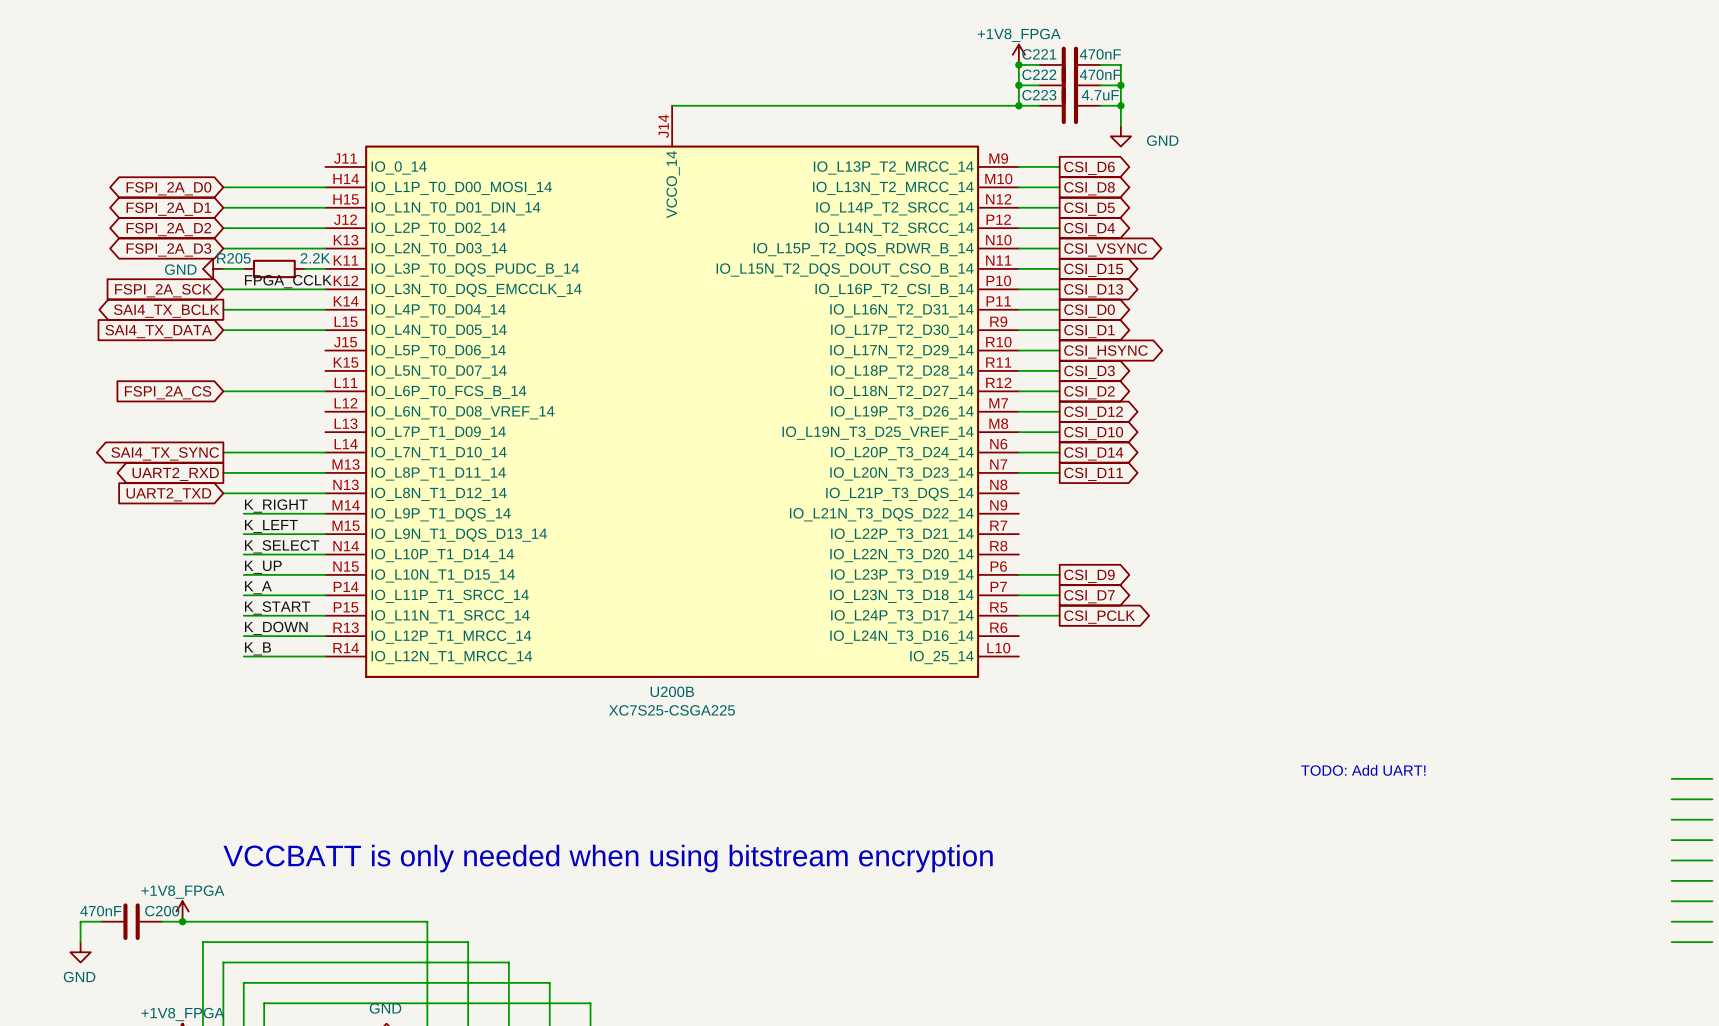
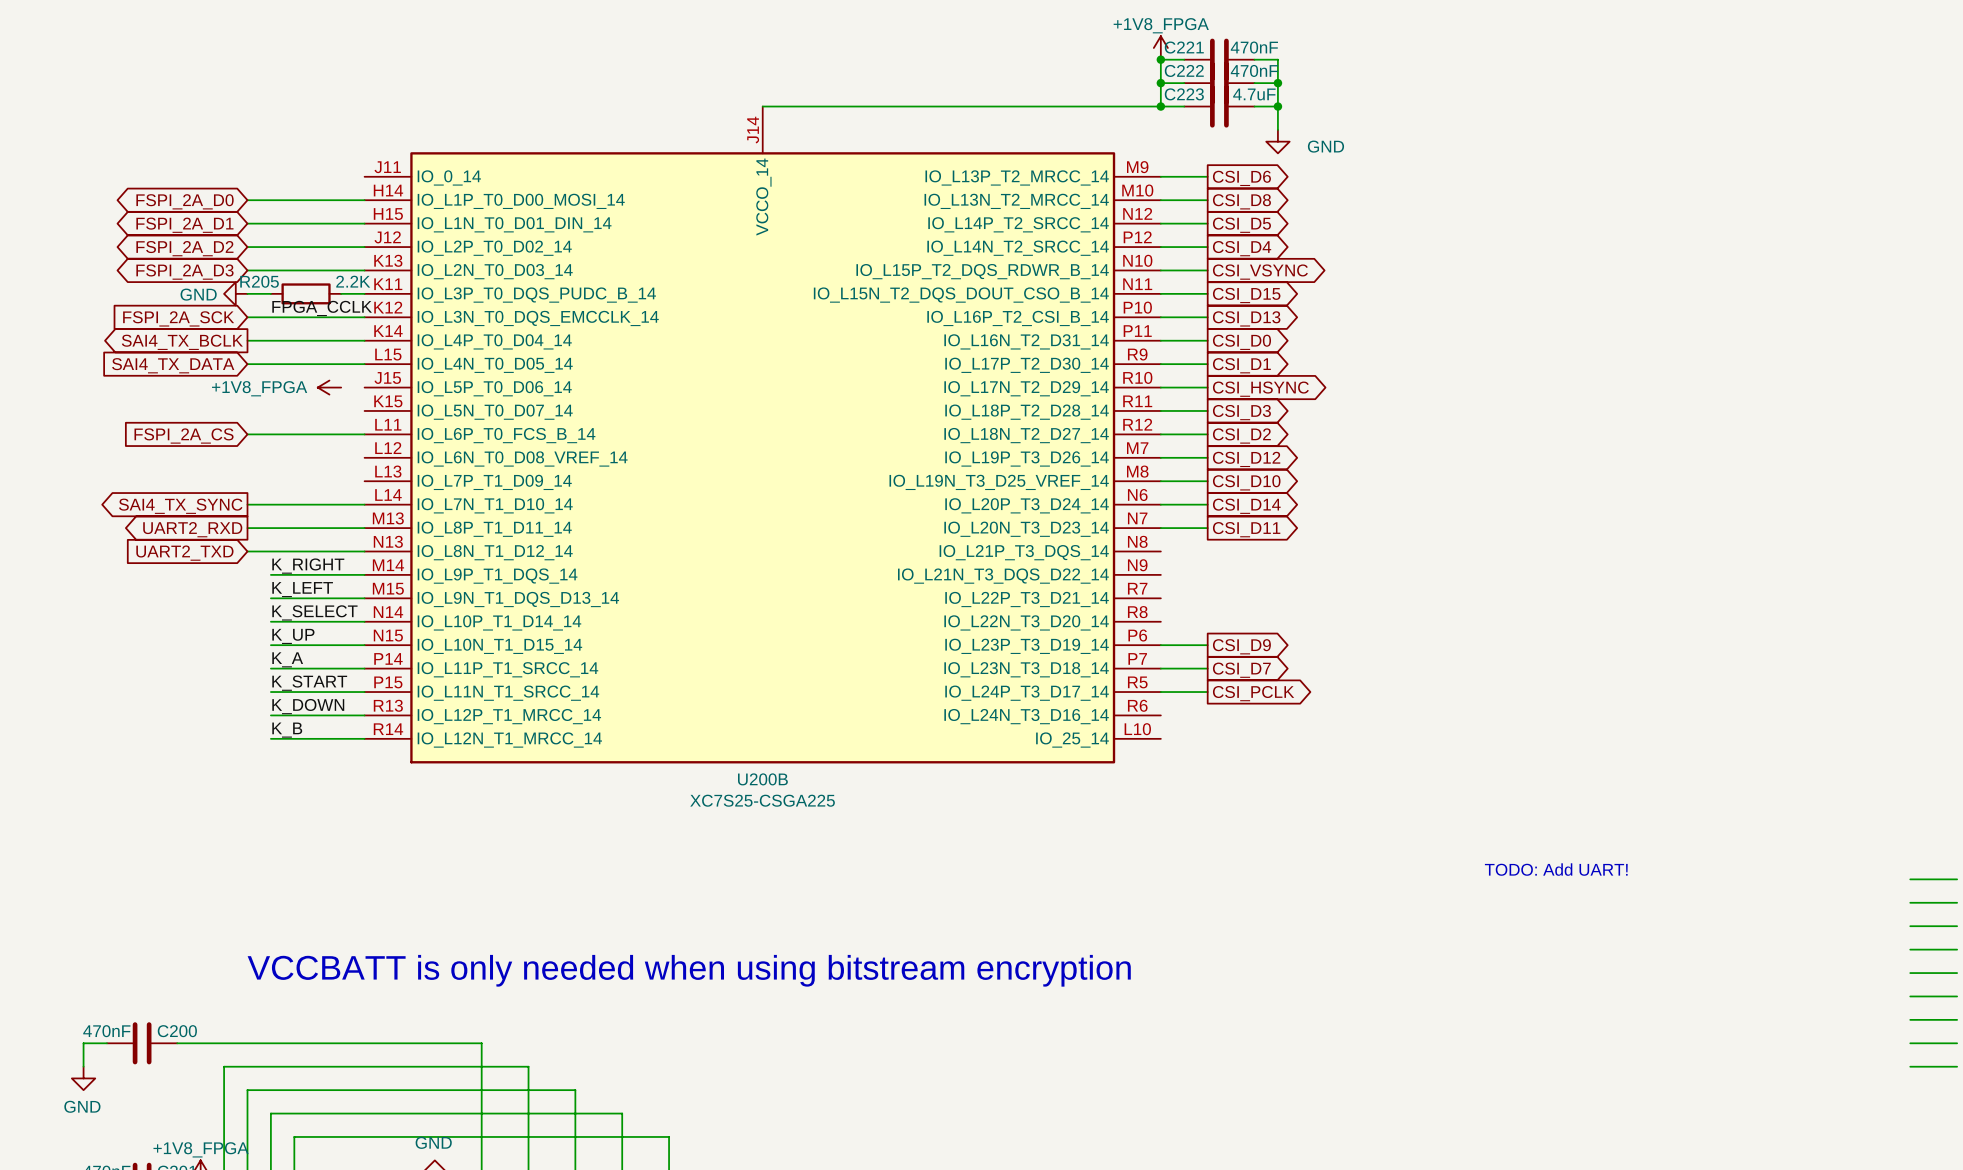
power symbol: none -> +1V8_FPGA (329, 387)
power symbol: +1V8_FPGA (182, 911) -> none
junction: (182, 921) -> none

